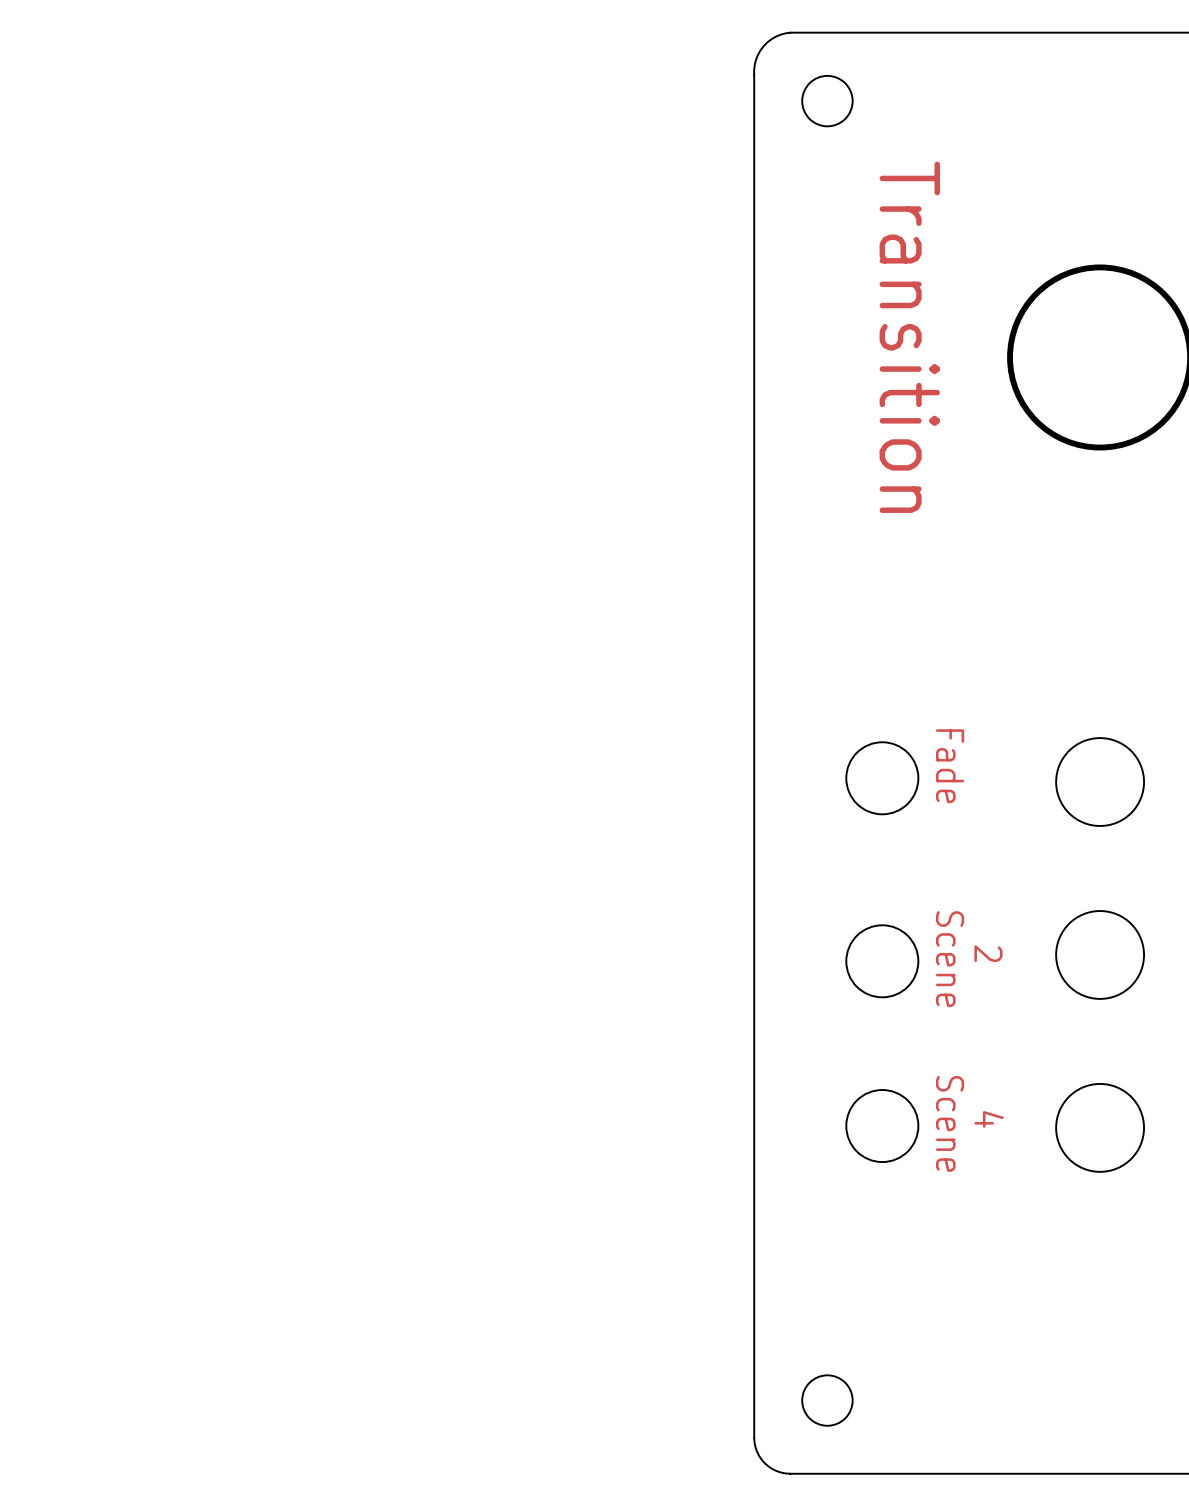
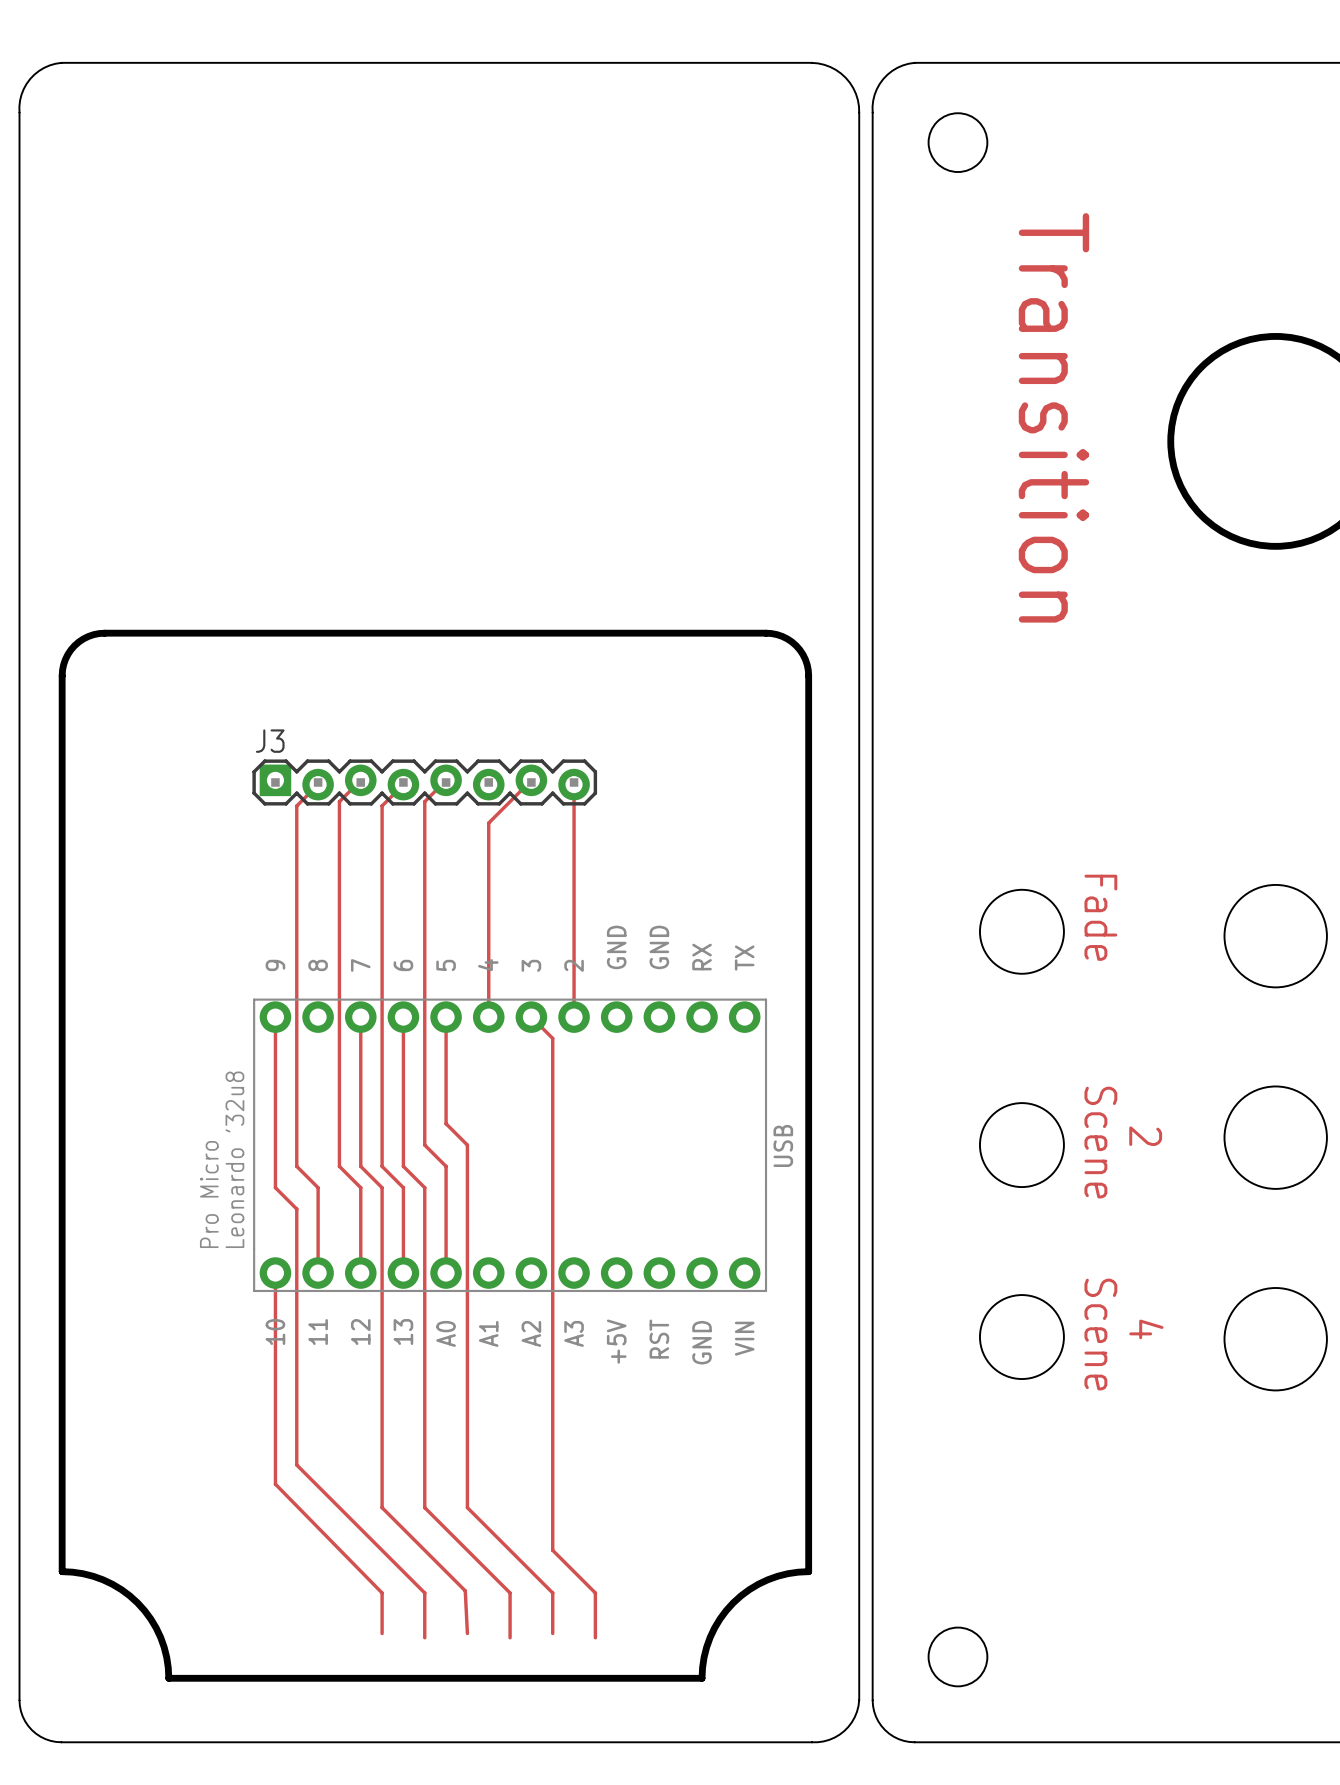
drawing: none -> [19, 62, 860, 1743]
board edge: none -> (104, 633) (766, 633) (787, 638) (802, 654) (808, 675) (808, 1571) (787, 1573) (767, 1579) (749, 1589) (733, 1602) (720, 1619) (710, 1637) (704, 1657) (702, 1678) (168, 1678) (166, 1657) (160, 1637) (150, 1619) (137, 1602) (121, 1589) (102, 1579) (82, 1573) (62, 1571) (62, 675) (65, 659) (74, 645) (88, 636) (104, 633)
track: none -> (360, 780) (339, 801) (339, 1166) (360, 1187) (360, 1273)
track: none -> (446, 780) (424, 801) (424, 1145) (446, 1166) (446, 1273)
track: none -> (531, 780) (488, 823) (488, 1017)
J3: none -> (424, 782)
track: none -> (318, 784) (296, 805) (296, 1166) (318, 1187) (318, 1273)
track: none -> (403, 784) (382, 805) (382, 1166) (403, 1187) (403, 1273)
track: none -> (574, 784) (574, 1017)
track: none -> (275, 1017) (275, 1187) (296, 1209) (296, 1465) (424, 1592) (424, 1637)
track: none -> (360, 1017) (360, 1166) (382, 1187) (382, 1507) (465, 1590) (467, 1633)
track: none -> (403, 1017) (403, 1166) (424, 1187) (424, 1507) (510, 1592) (510, 1637)
track: none -> (446, 1017) (446, 1123) (467, 1145) (467, 1507) (552, 1592) (552, 1633)
track: none -> (531, 1017) (552, 1038) (552, 1550) (595, 1592) (595, 1637)
part: none -> (510, 1145)
track: none -> (275, 1273) (275, 1484) (382, 1592) (382, 1633)

